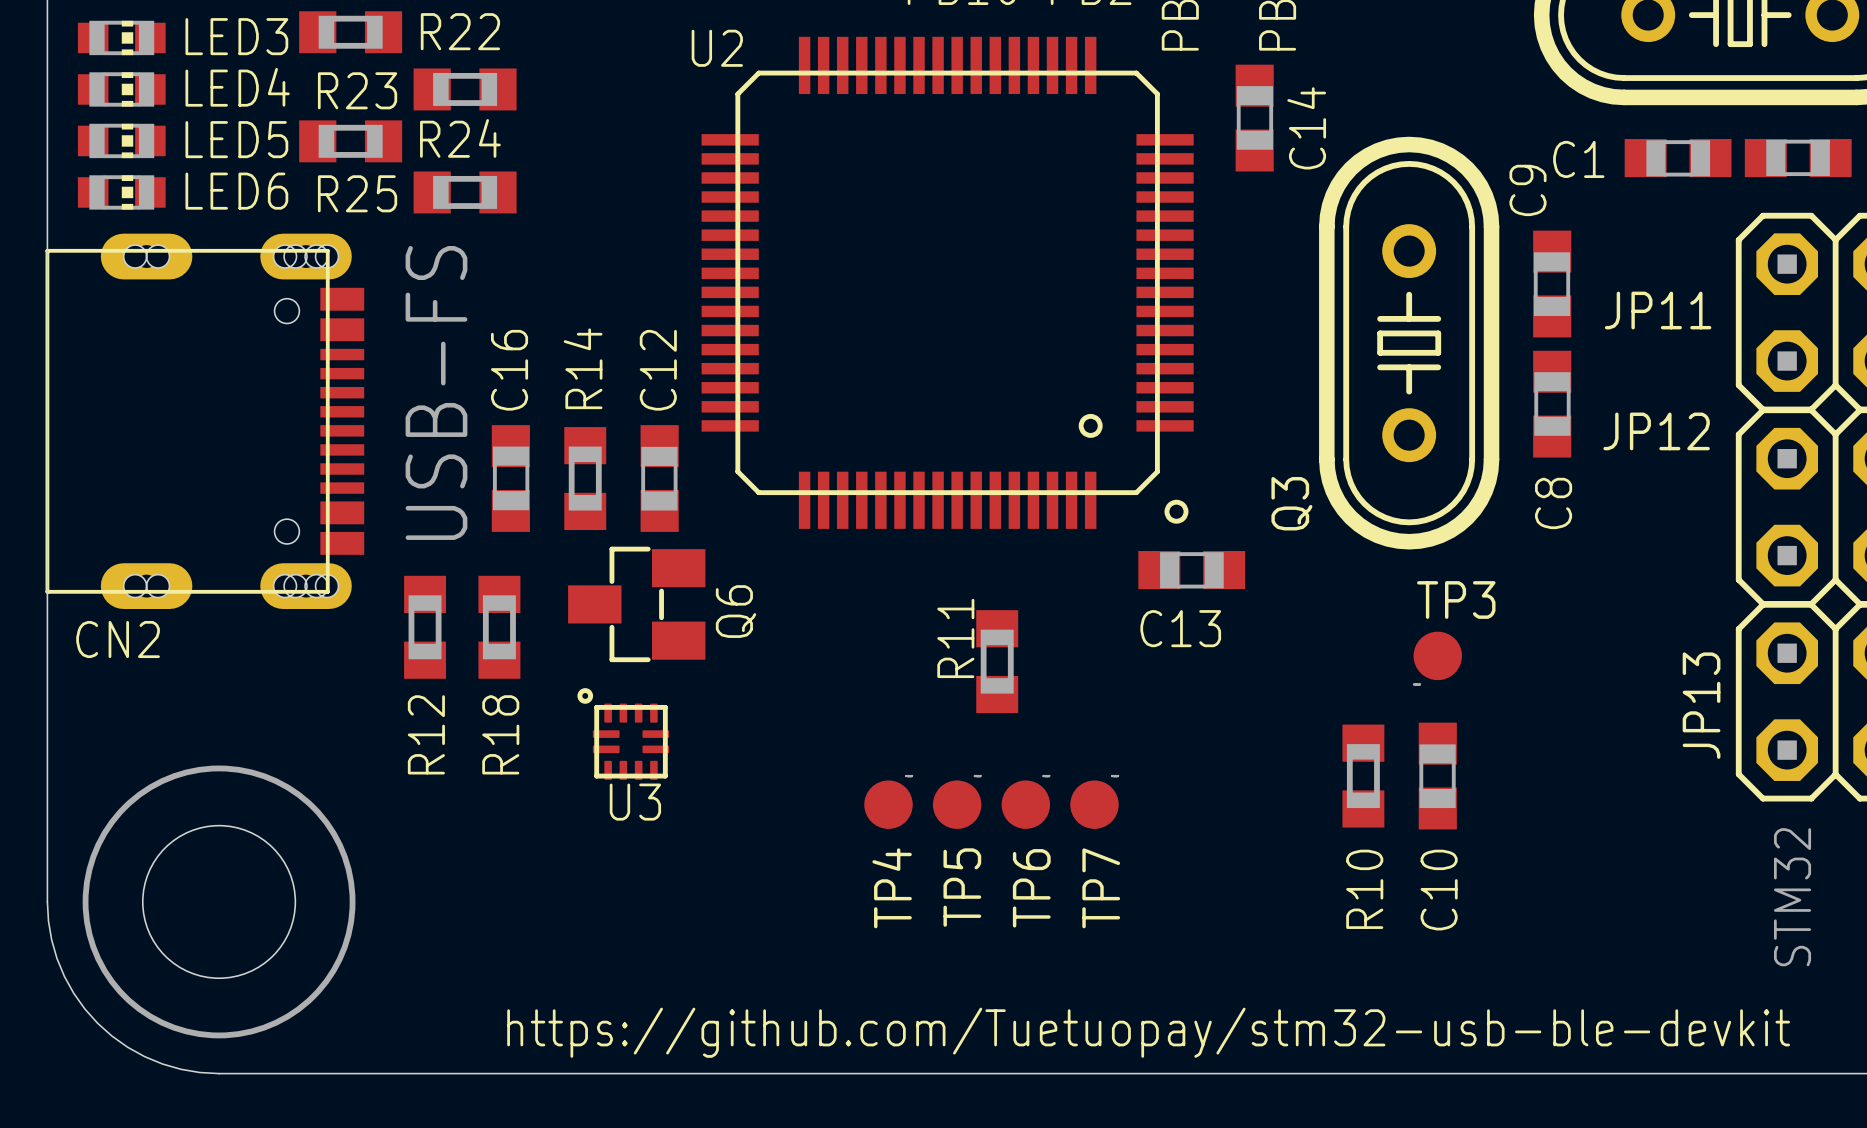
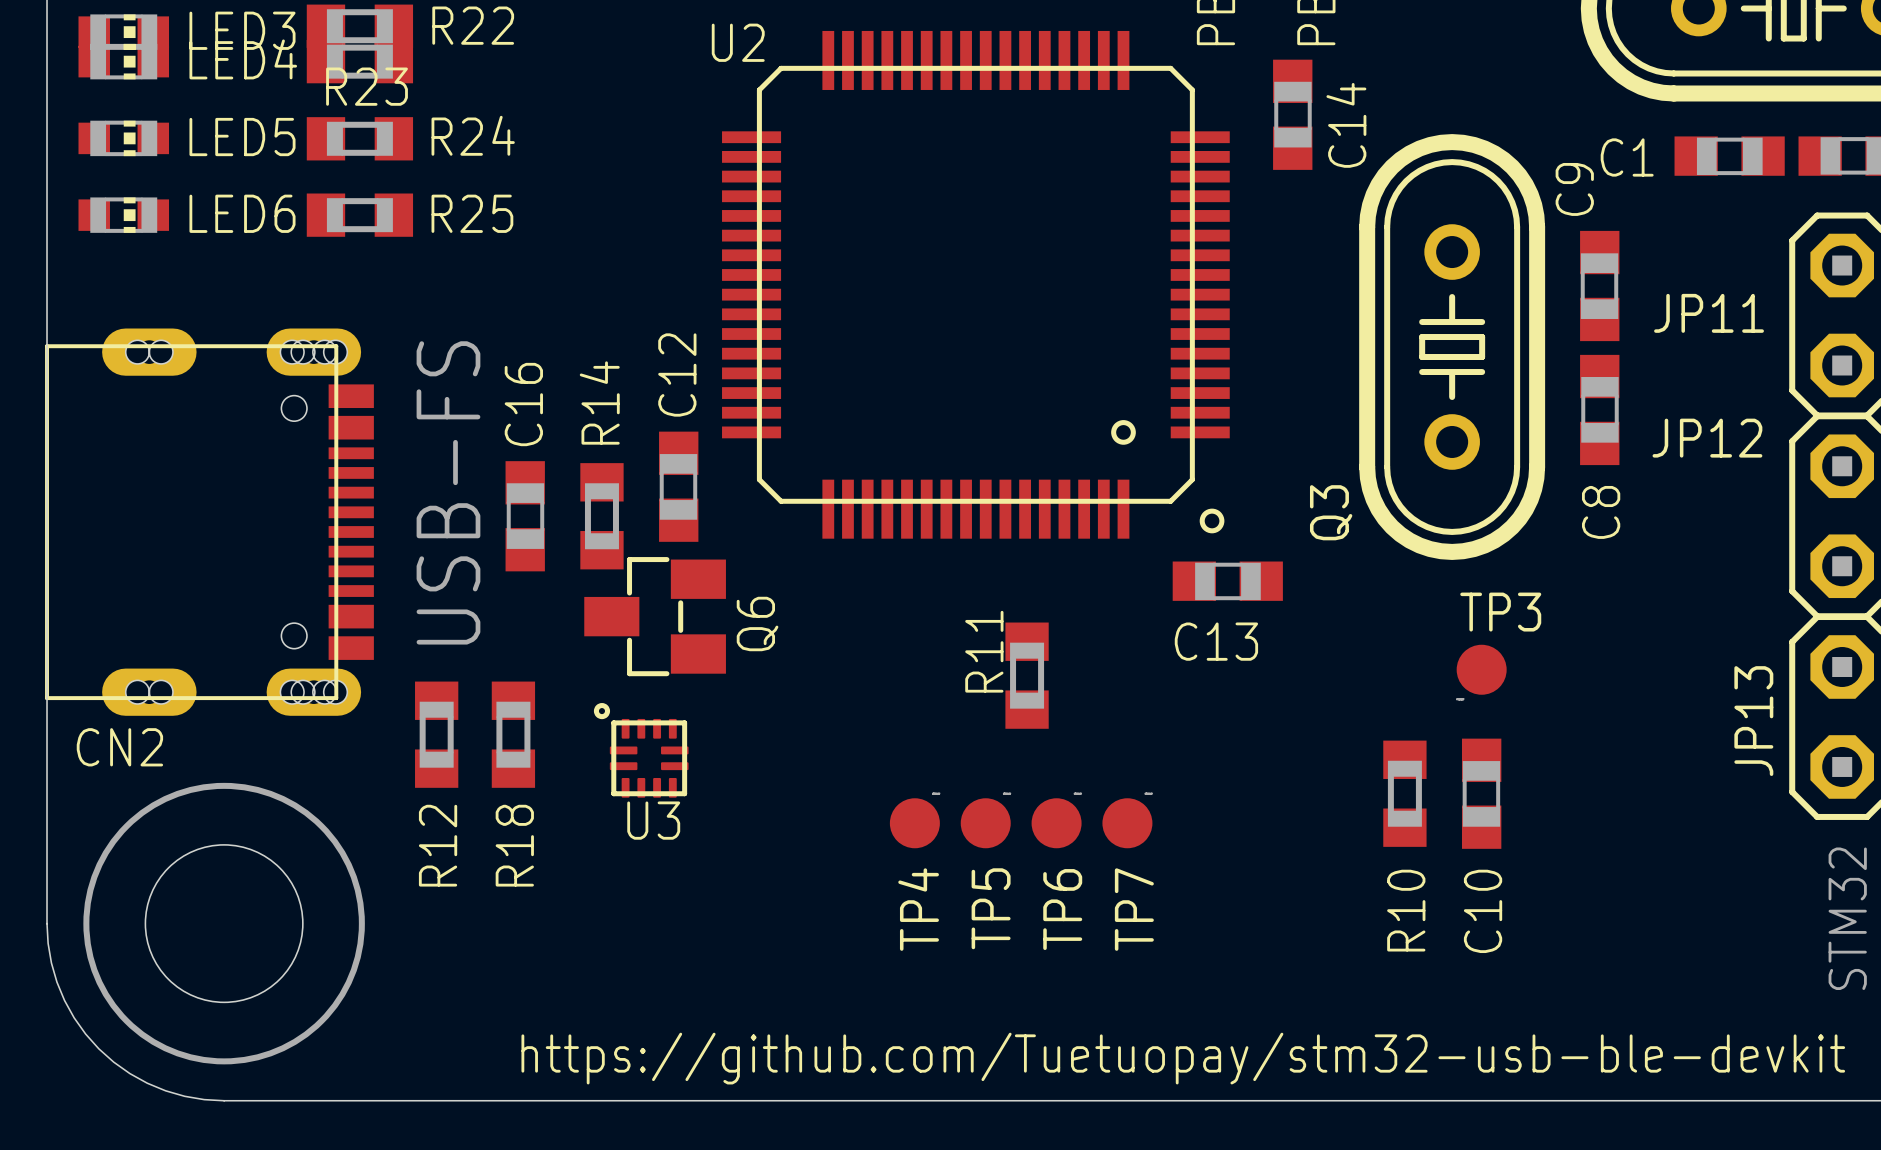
LED4 position: (121, 89) -> (123, 61)
R23 position: (465, 89) -> (359, 61)
LED6 position: (121, 192) -> (123, 215)
R25 position: (465, 192) -> (359, 215)
R25 name position: R25 (357, 193) -> R25 (472, 213)
text position: USB-FS (436, 392) -> USB-FS (448, 492)
CN2 position: (204, 421) -> (209, 522)
C16 position: (510, 478) -> (525, 516)
R14 position: (585, 478) -> (601, 516)
R12 position: (425, 627) -> (436, 734)
R18 position: (499, 627) -> (513, 734)

